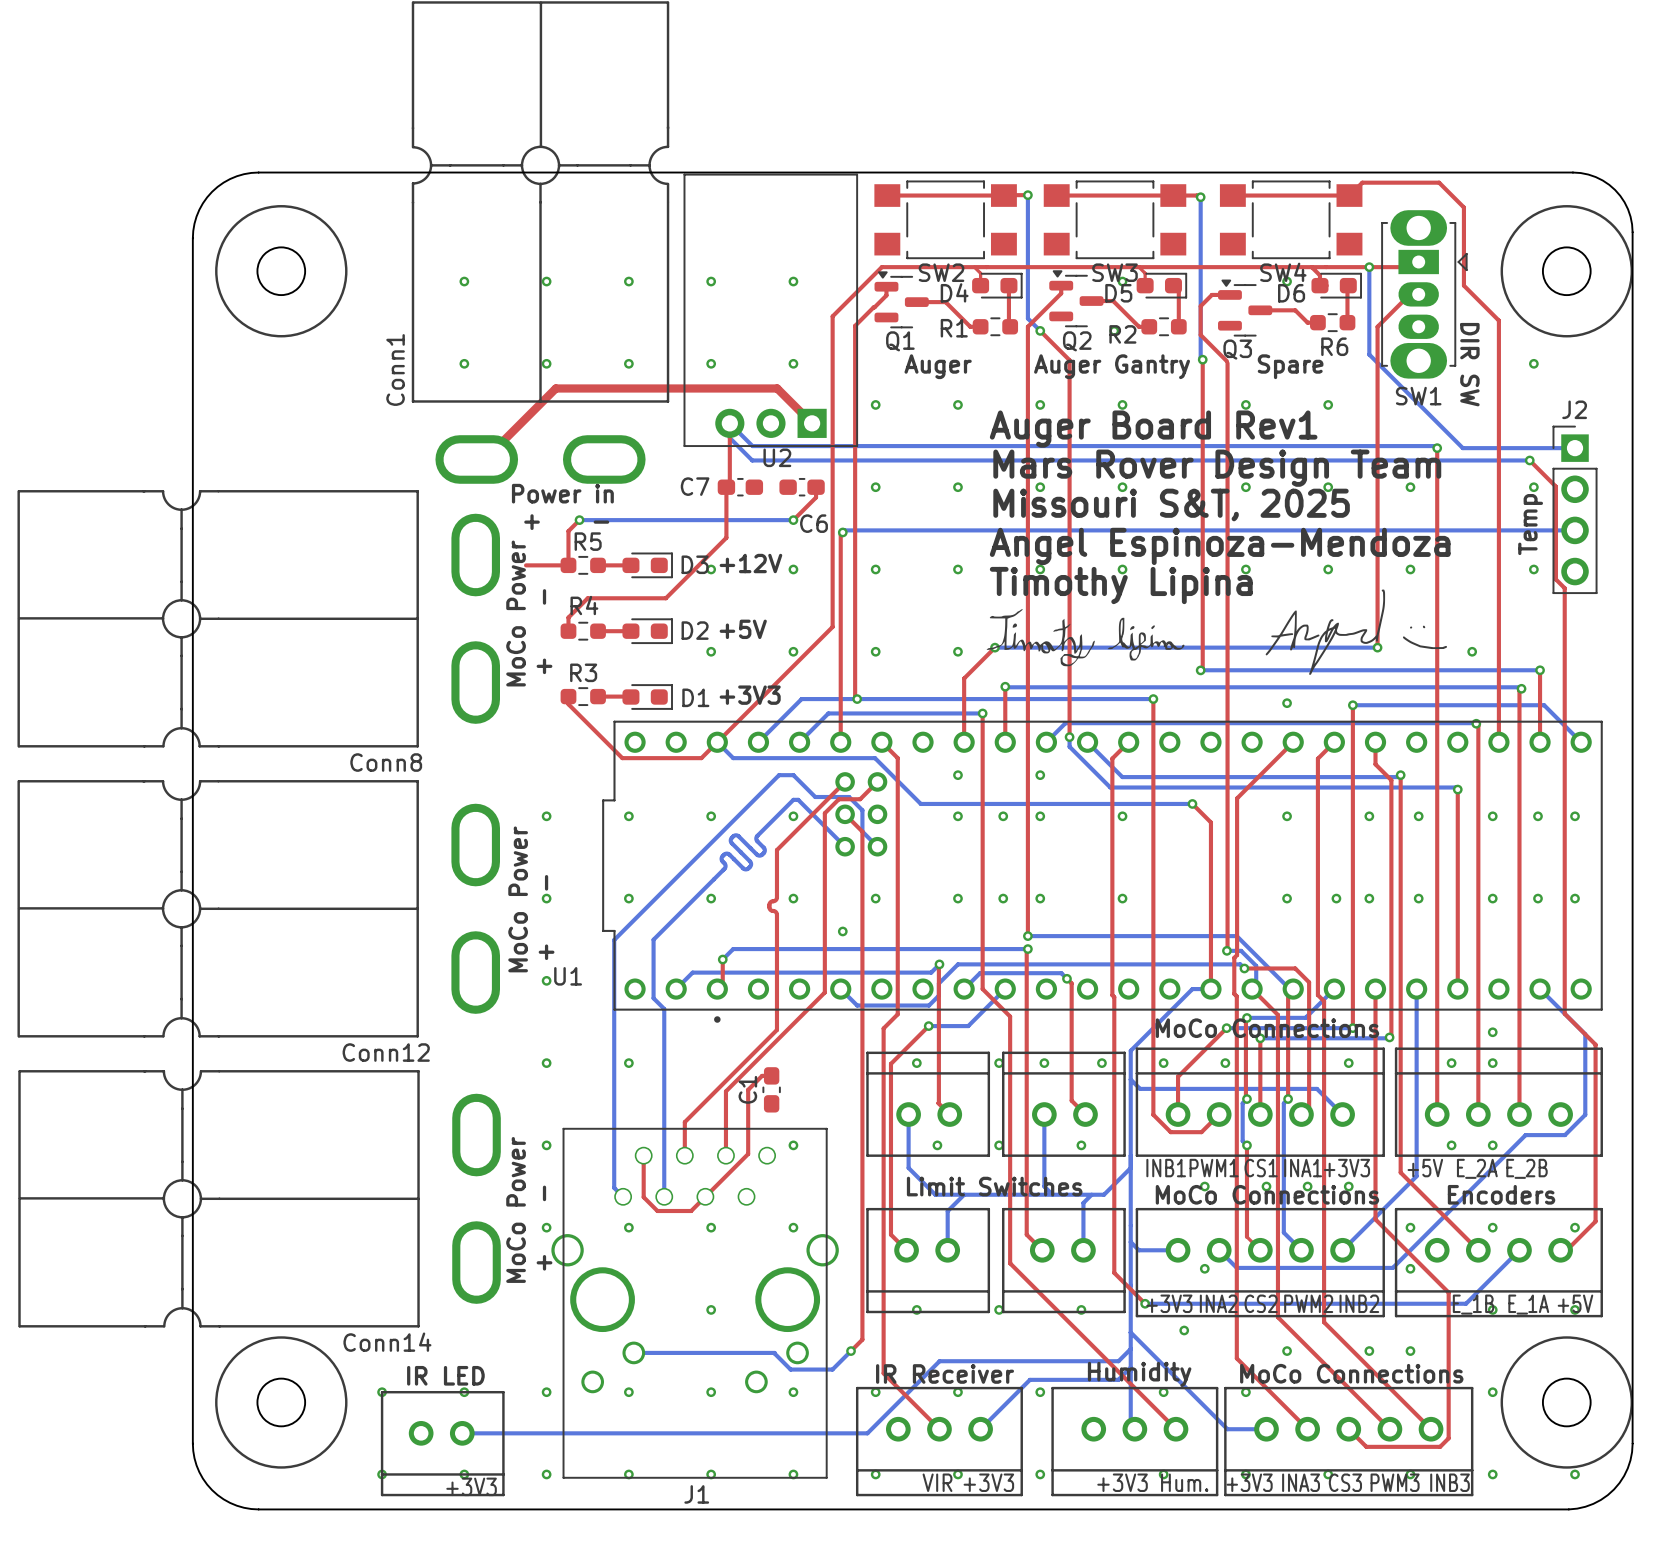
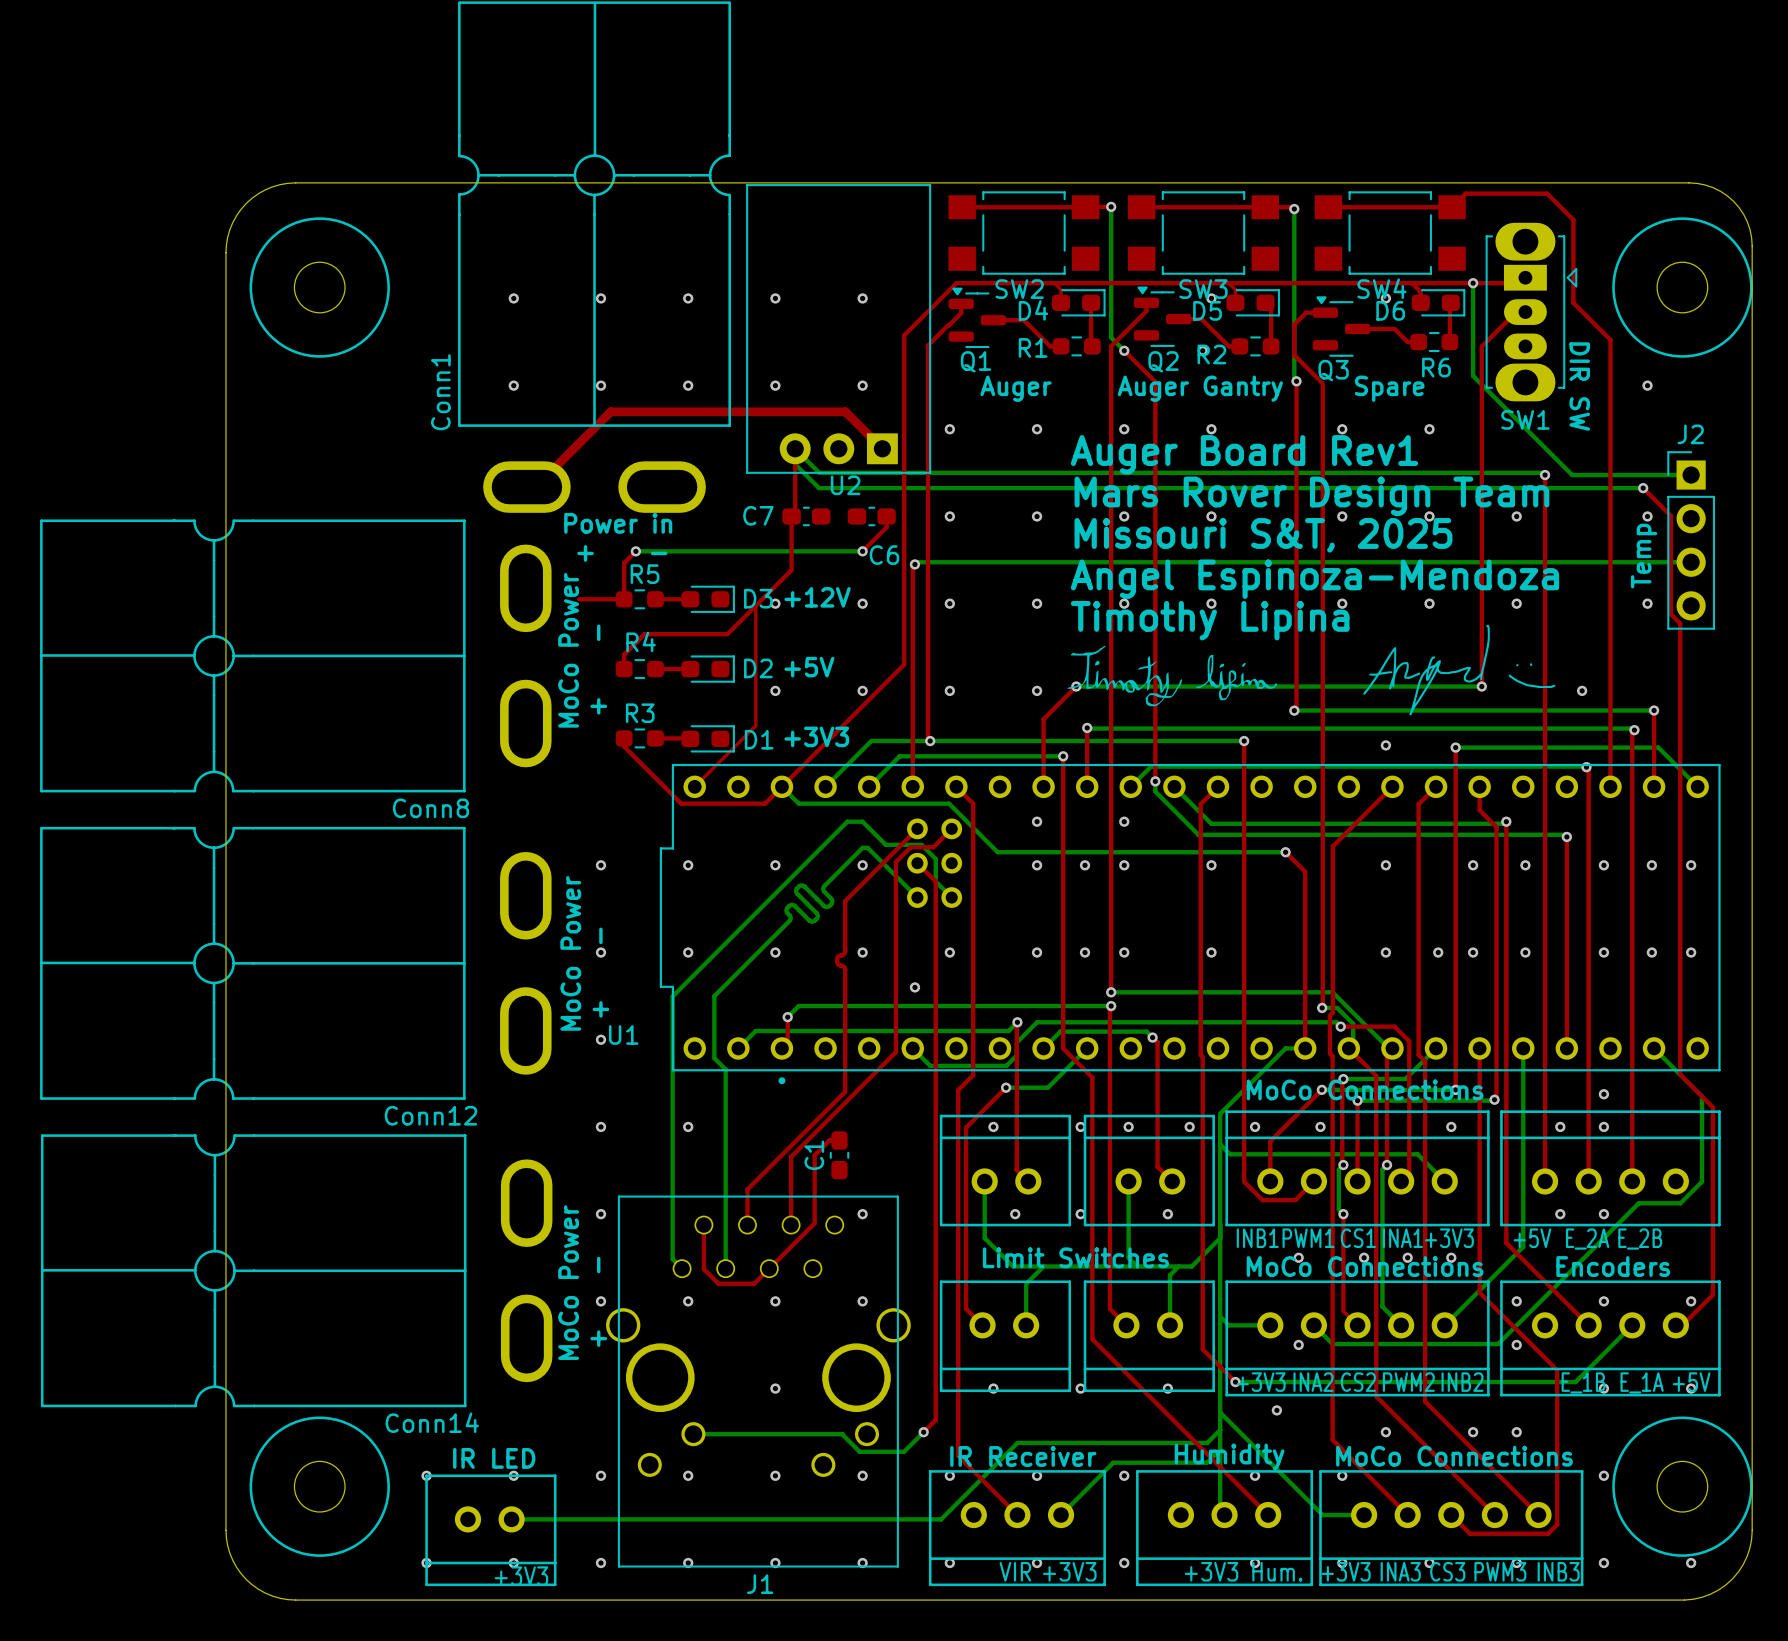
top track: none -> (755, 605) (755, 725) (694, 786)

